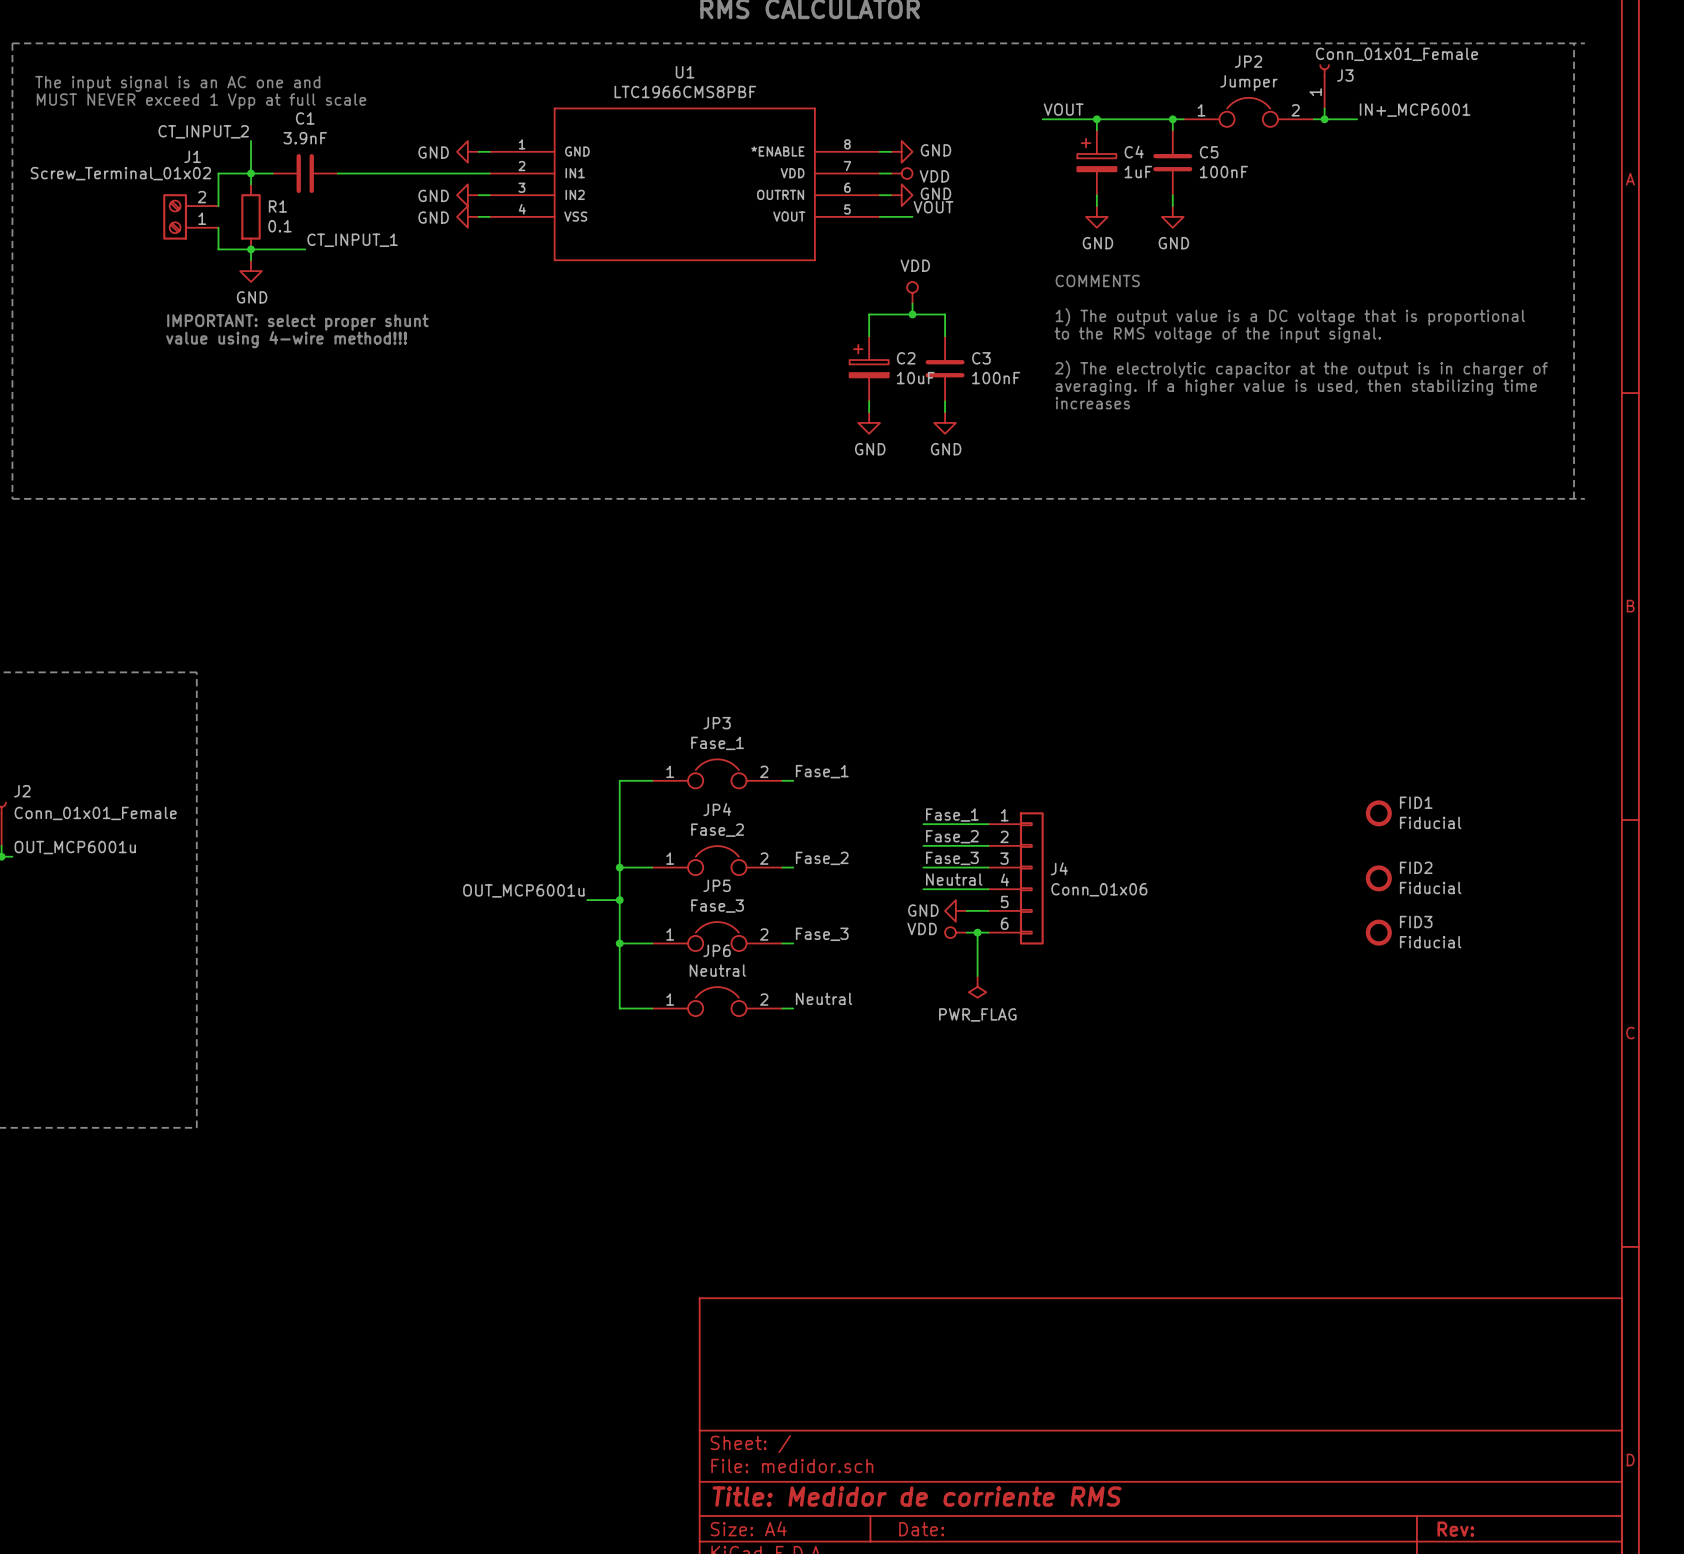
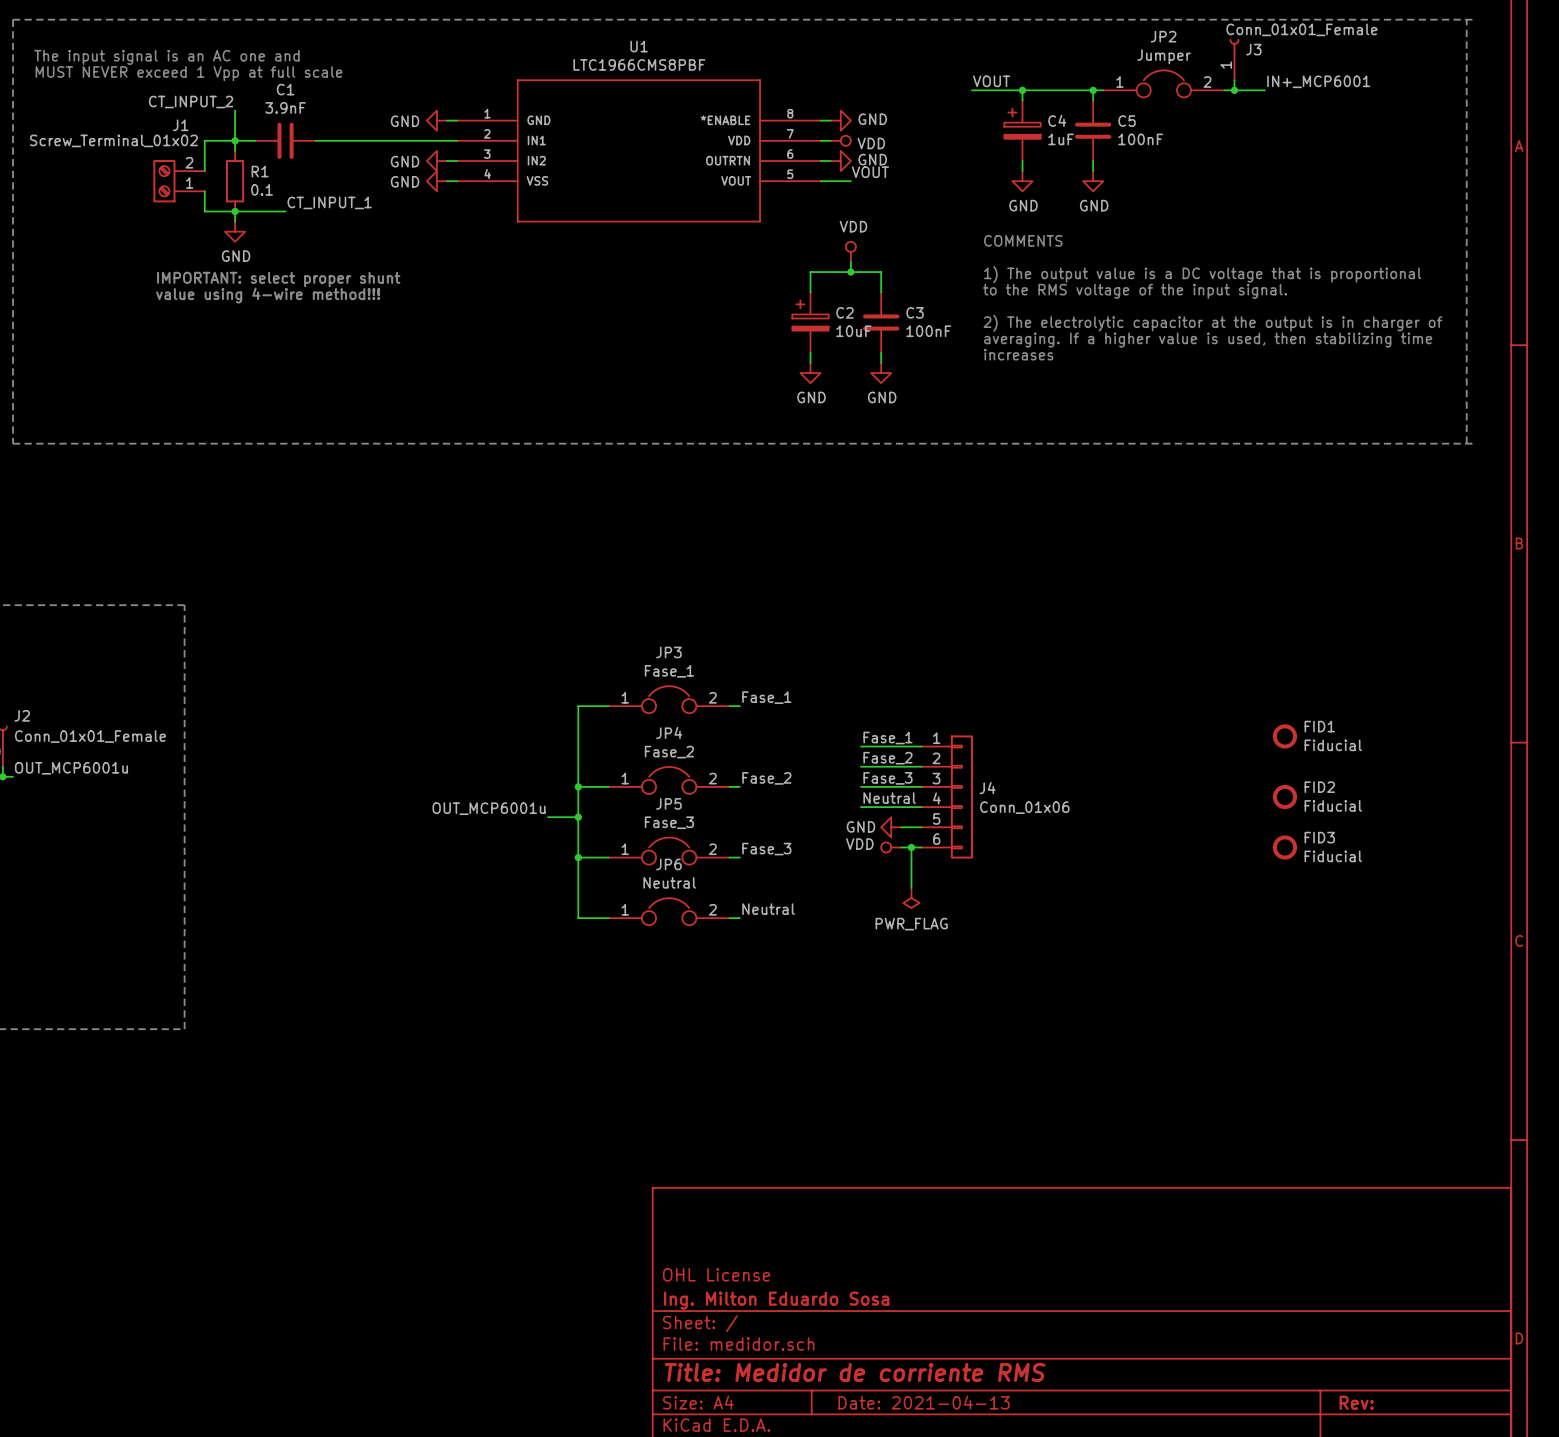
title block: none -> OHL License (716, 1274)
title block: none -> Ing. Milton Eduardo Sosa (776, 1300)
title block: Date: (921, 1529) -> Date: 2021-04-13 (924, 1402)

